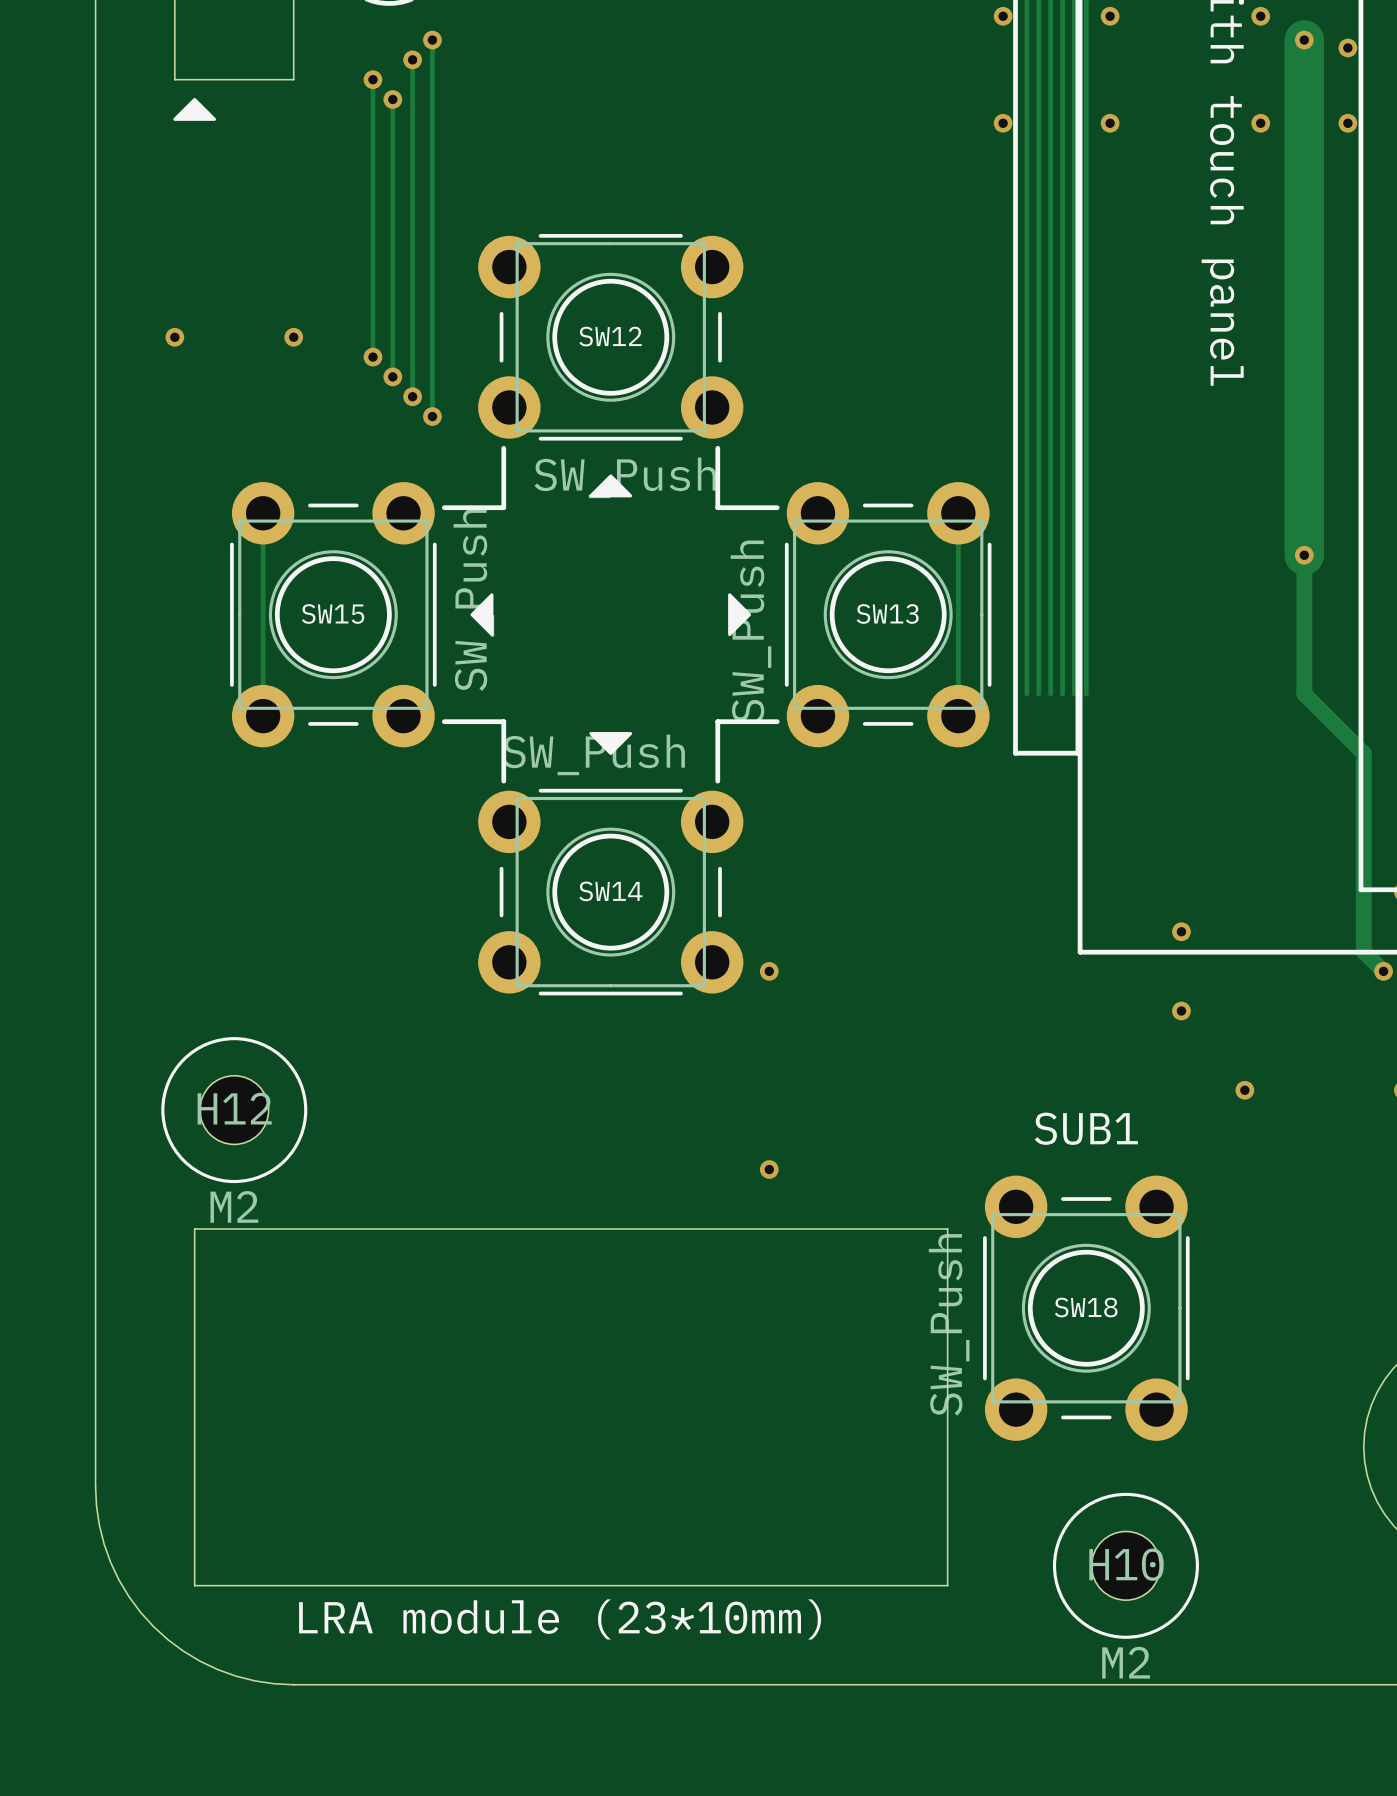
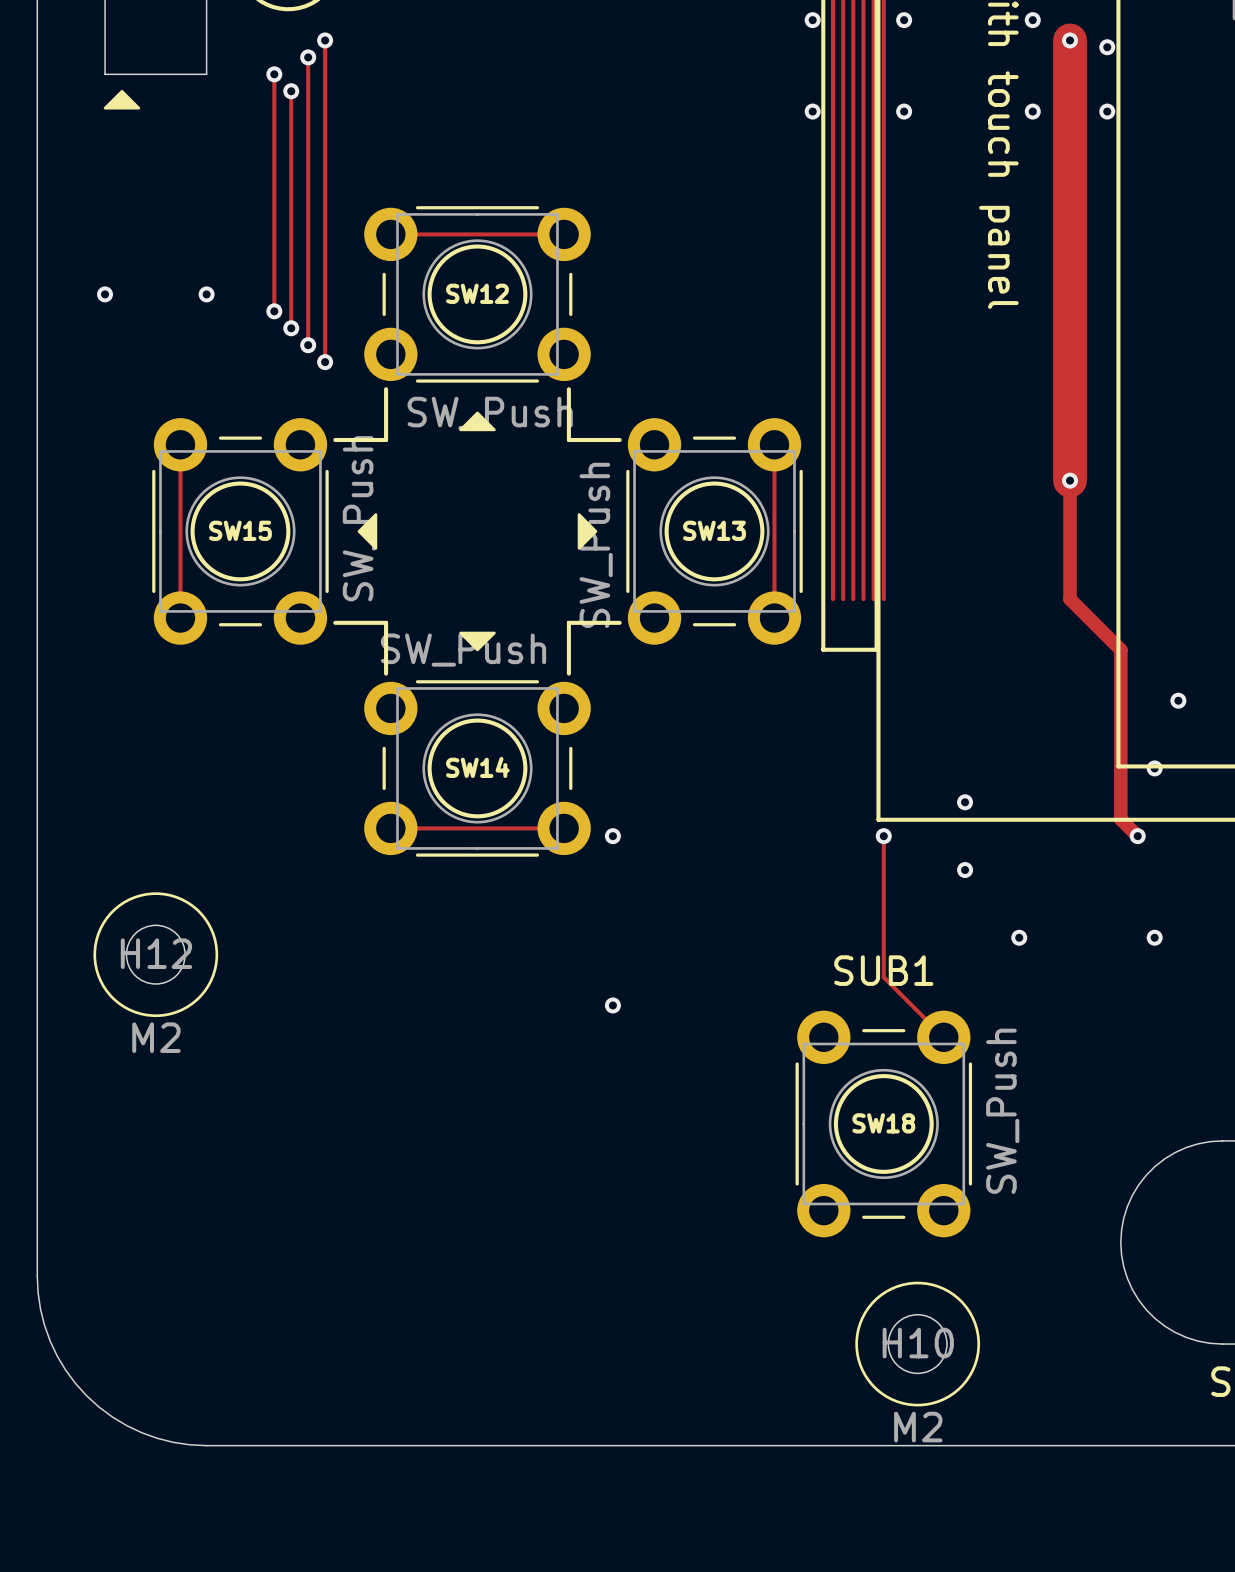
track: none -> (390, 234) (564, 234)
track: none -> (390, 828) (564, 828)
track: none -> (883, 836) (883, 977) (943, 1037)
via: none -> (883, 836)
board edge: (194, 1228) (947, 1228) (947, 1585) (194, 1585) (194, 1228) -> none
SW18 rotation: 0° (1086, 1308) -> 180° (883, 1123)
text: LRA module (23*10mm) (560, 1619) -> none

